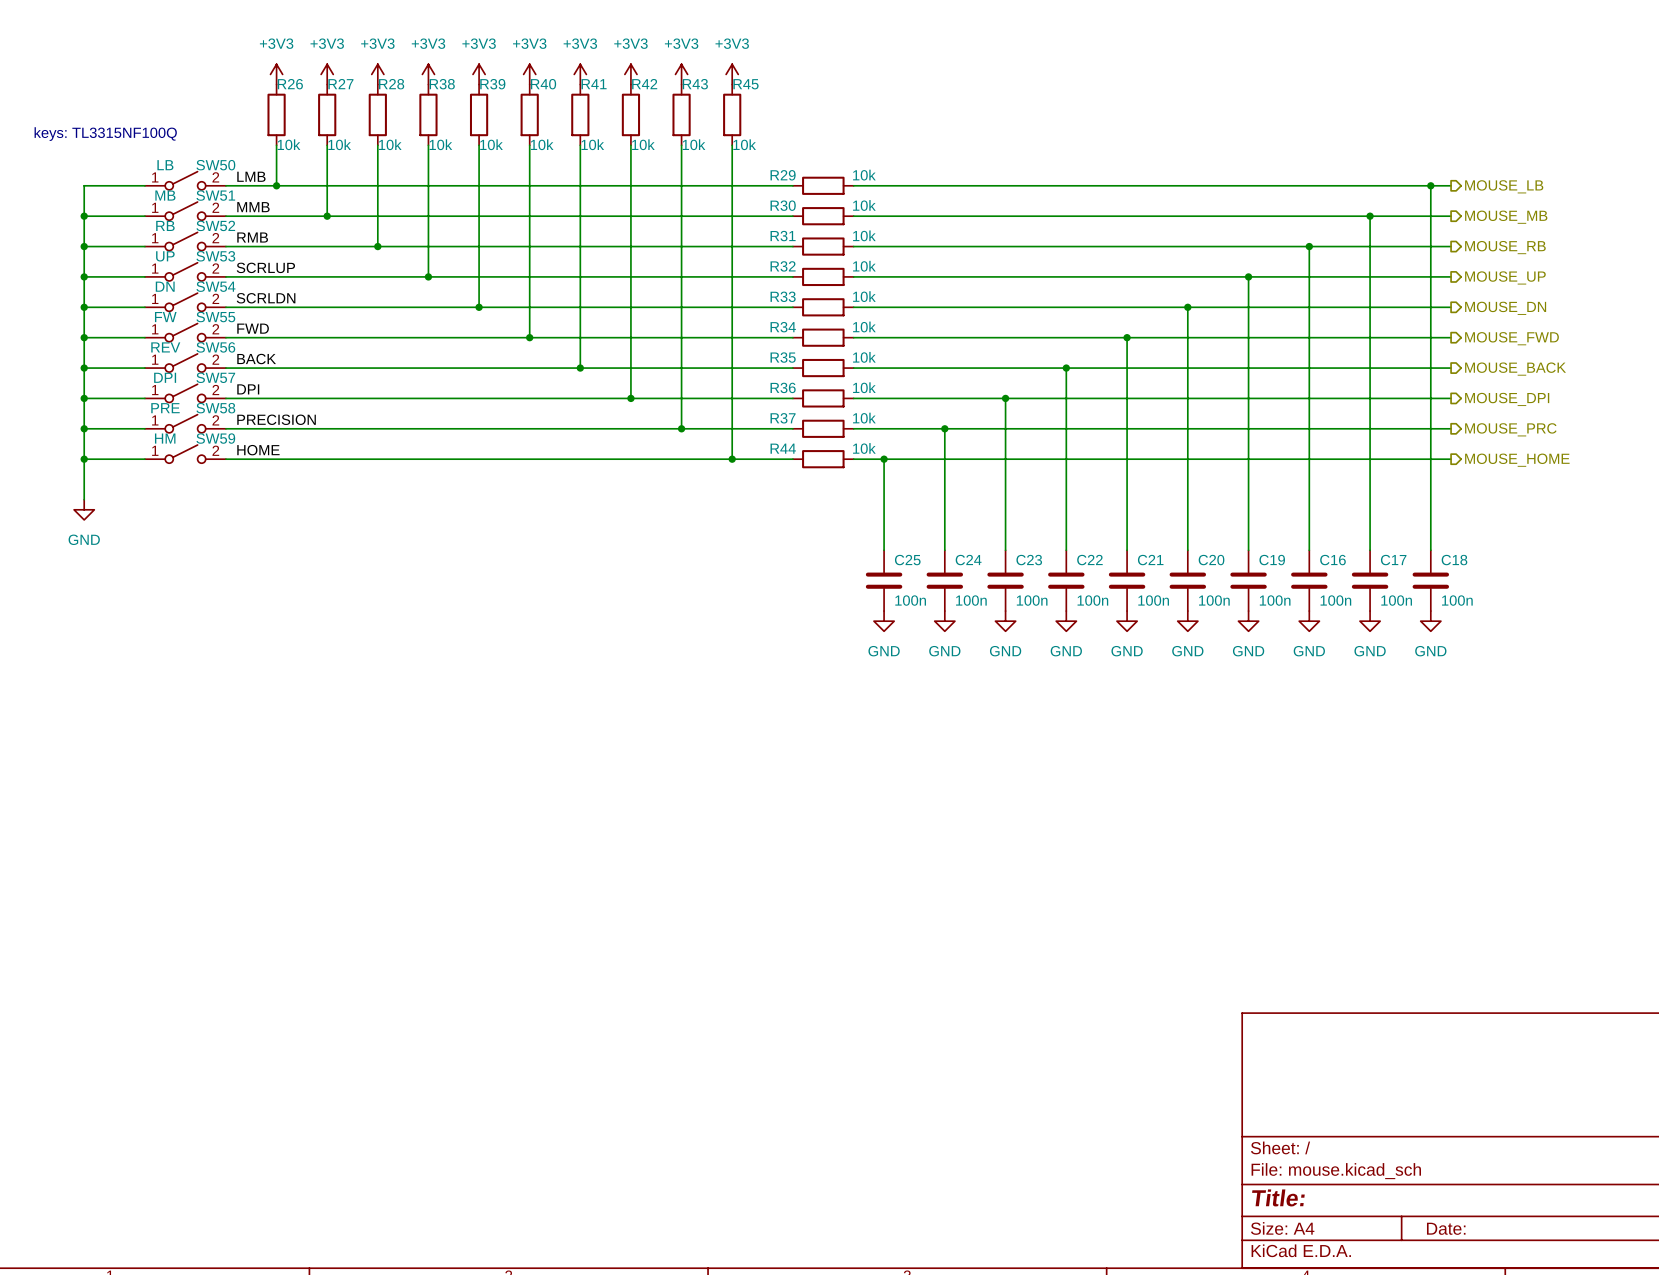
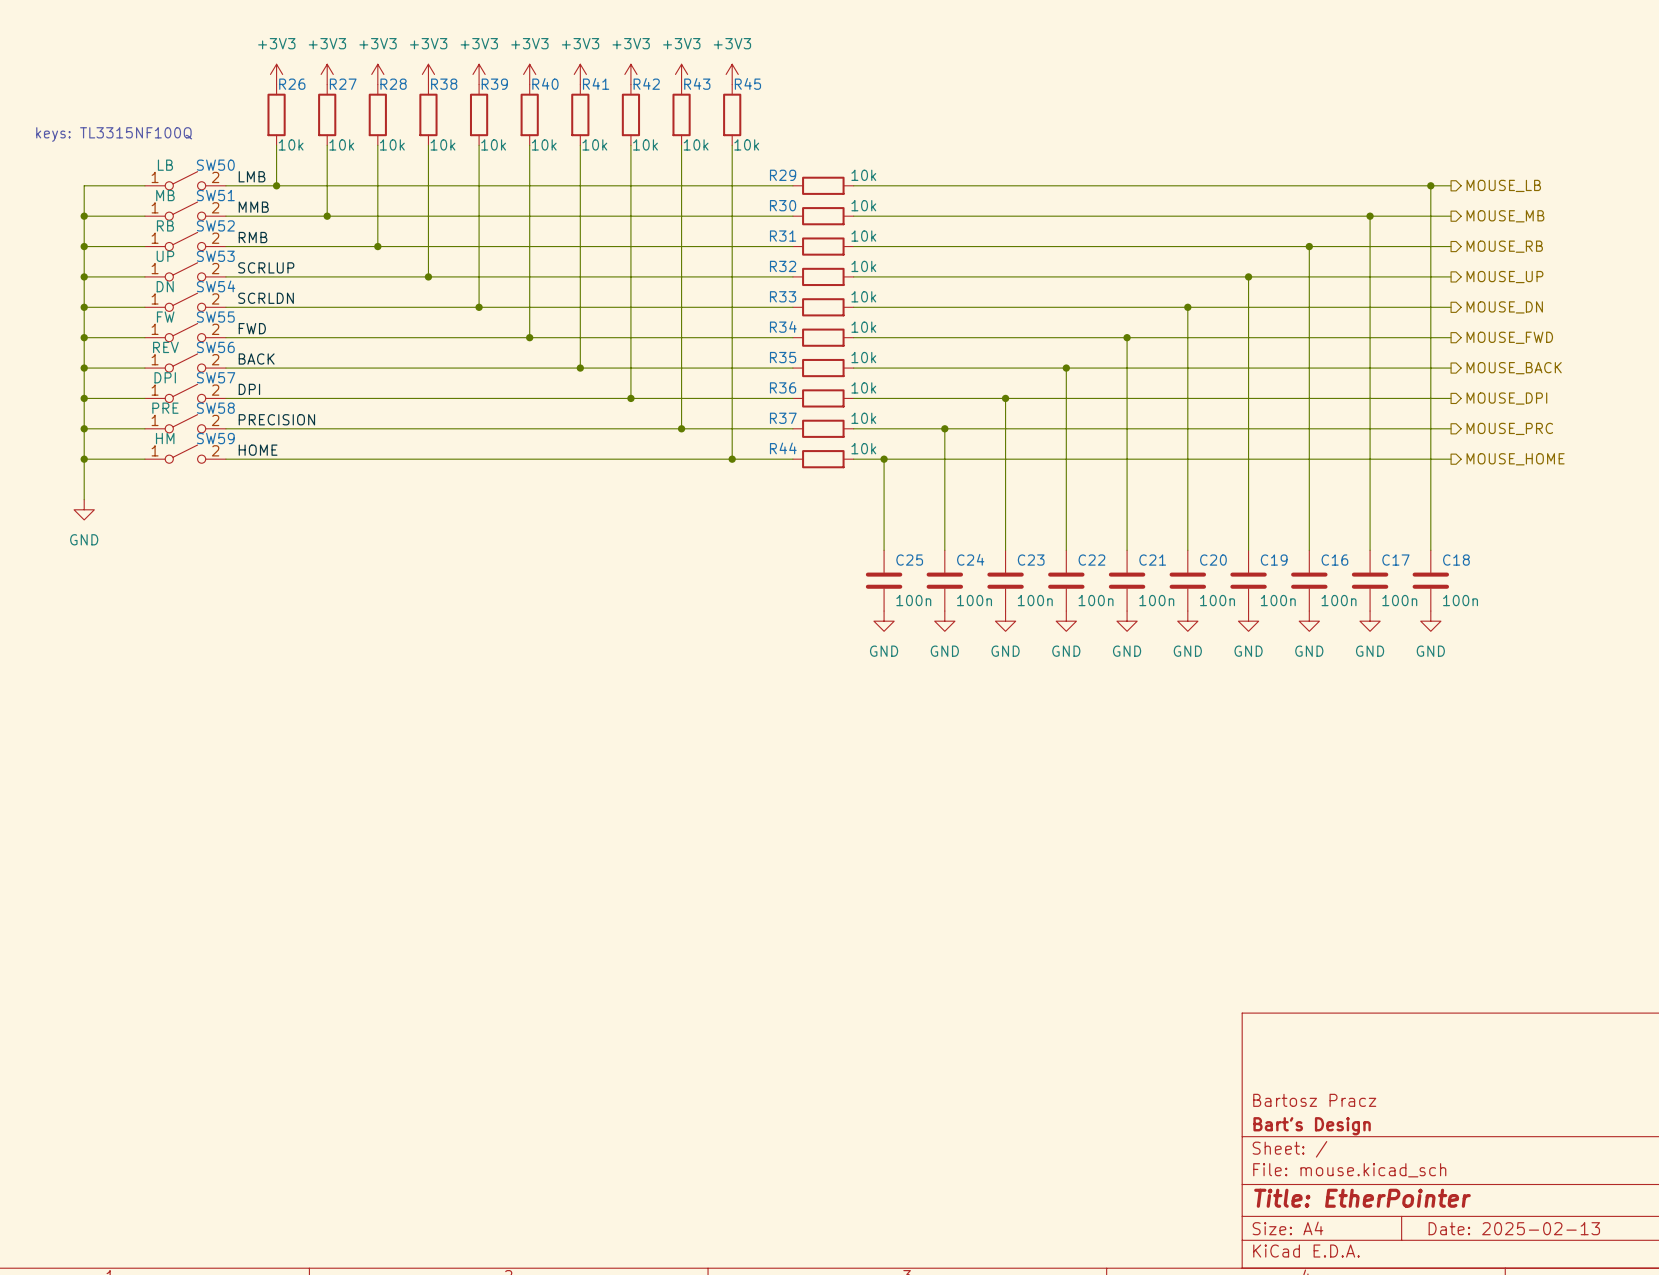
title block: none -> Bartosz Pracz (1314, 1100)
title block: none -> Bart's Design (1312, 1126)
title block: Title: (1278, 1197) -> Title: EtherPointer (1362, 1198)
title block: Date: (1446, 1228) -> Date: 2025-02-13 (1514, 1228)

